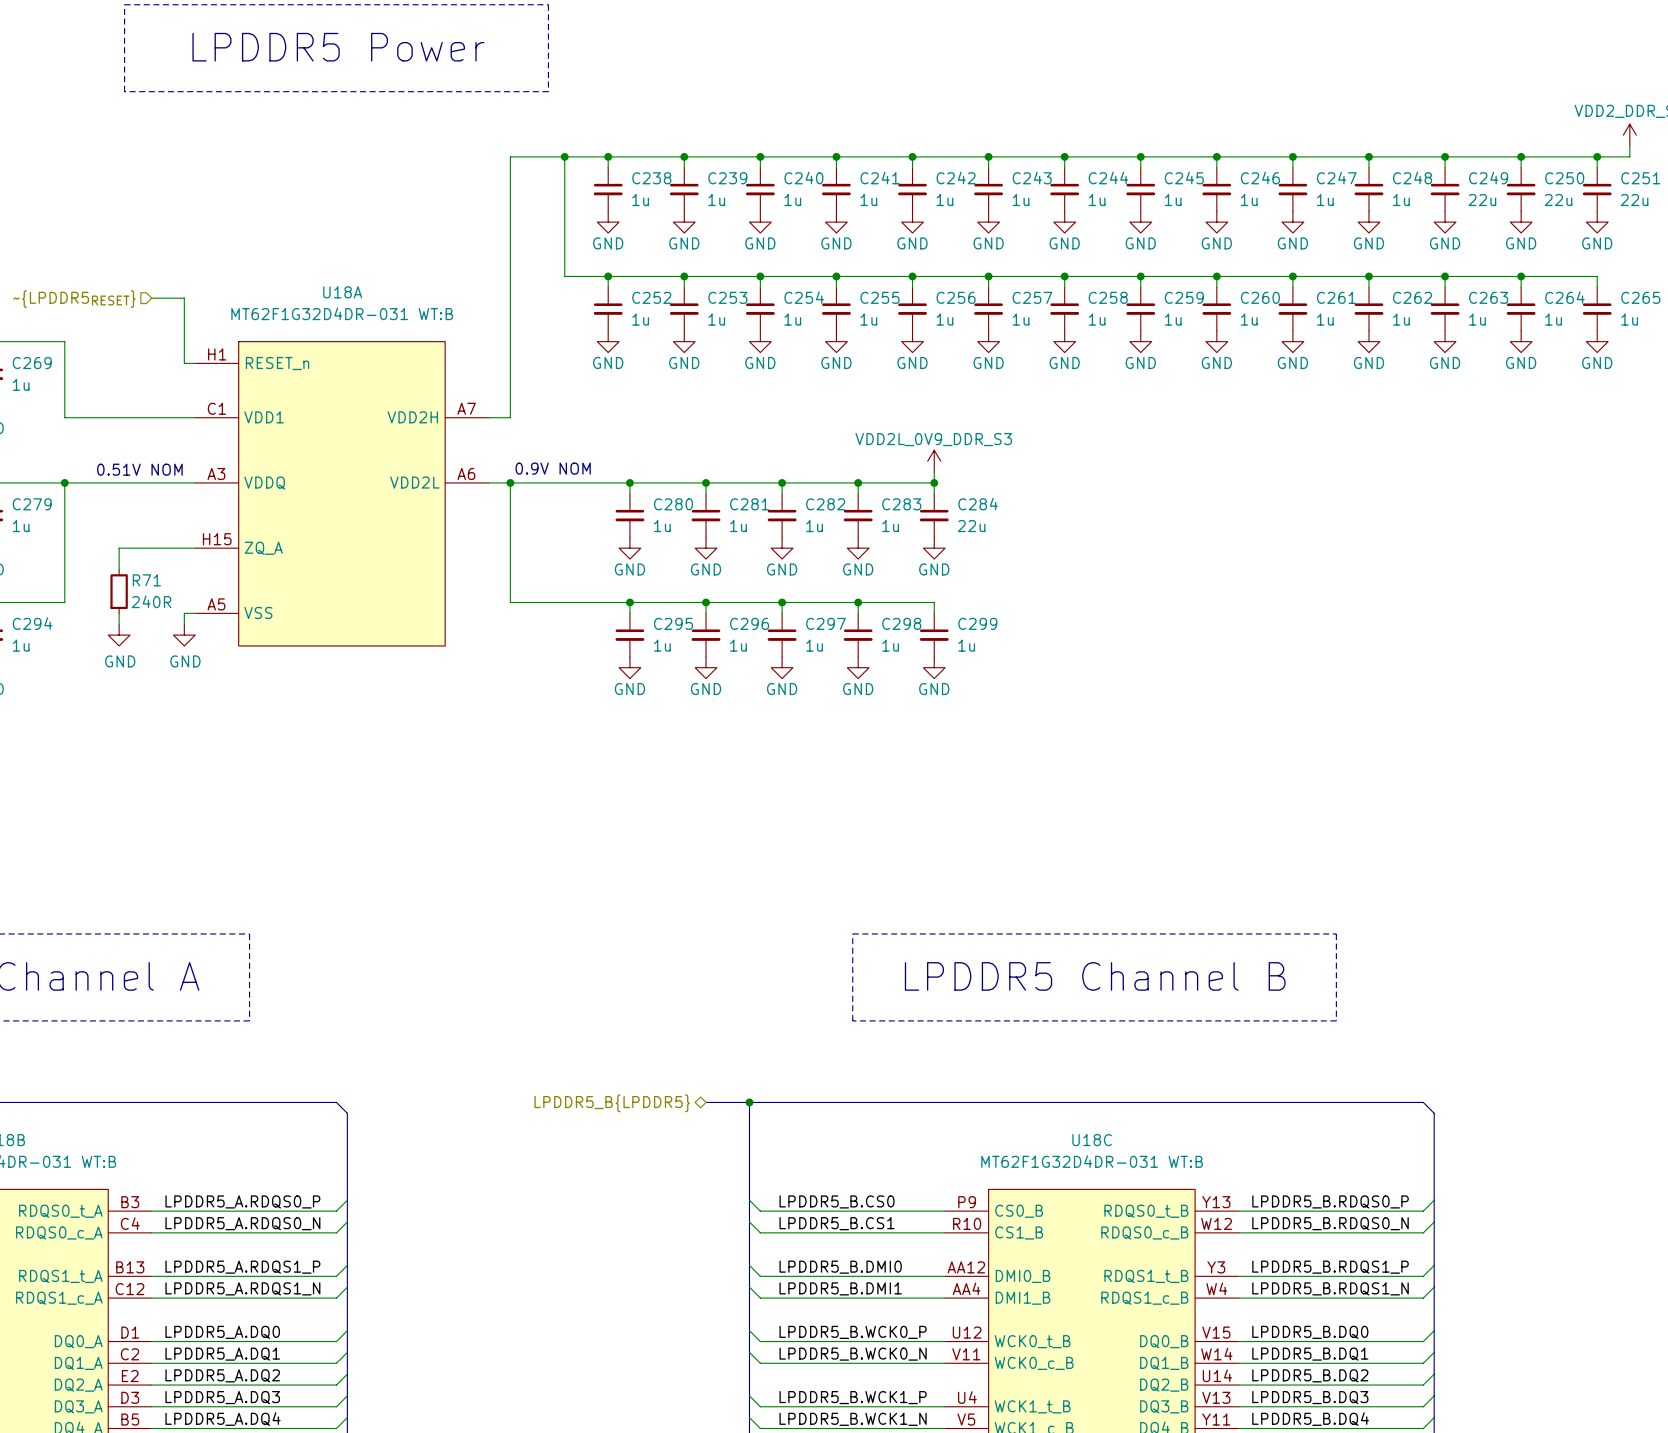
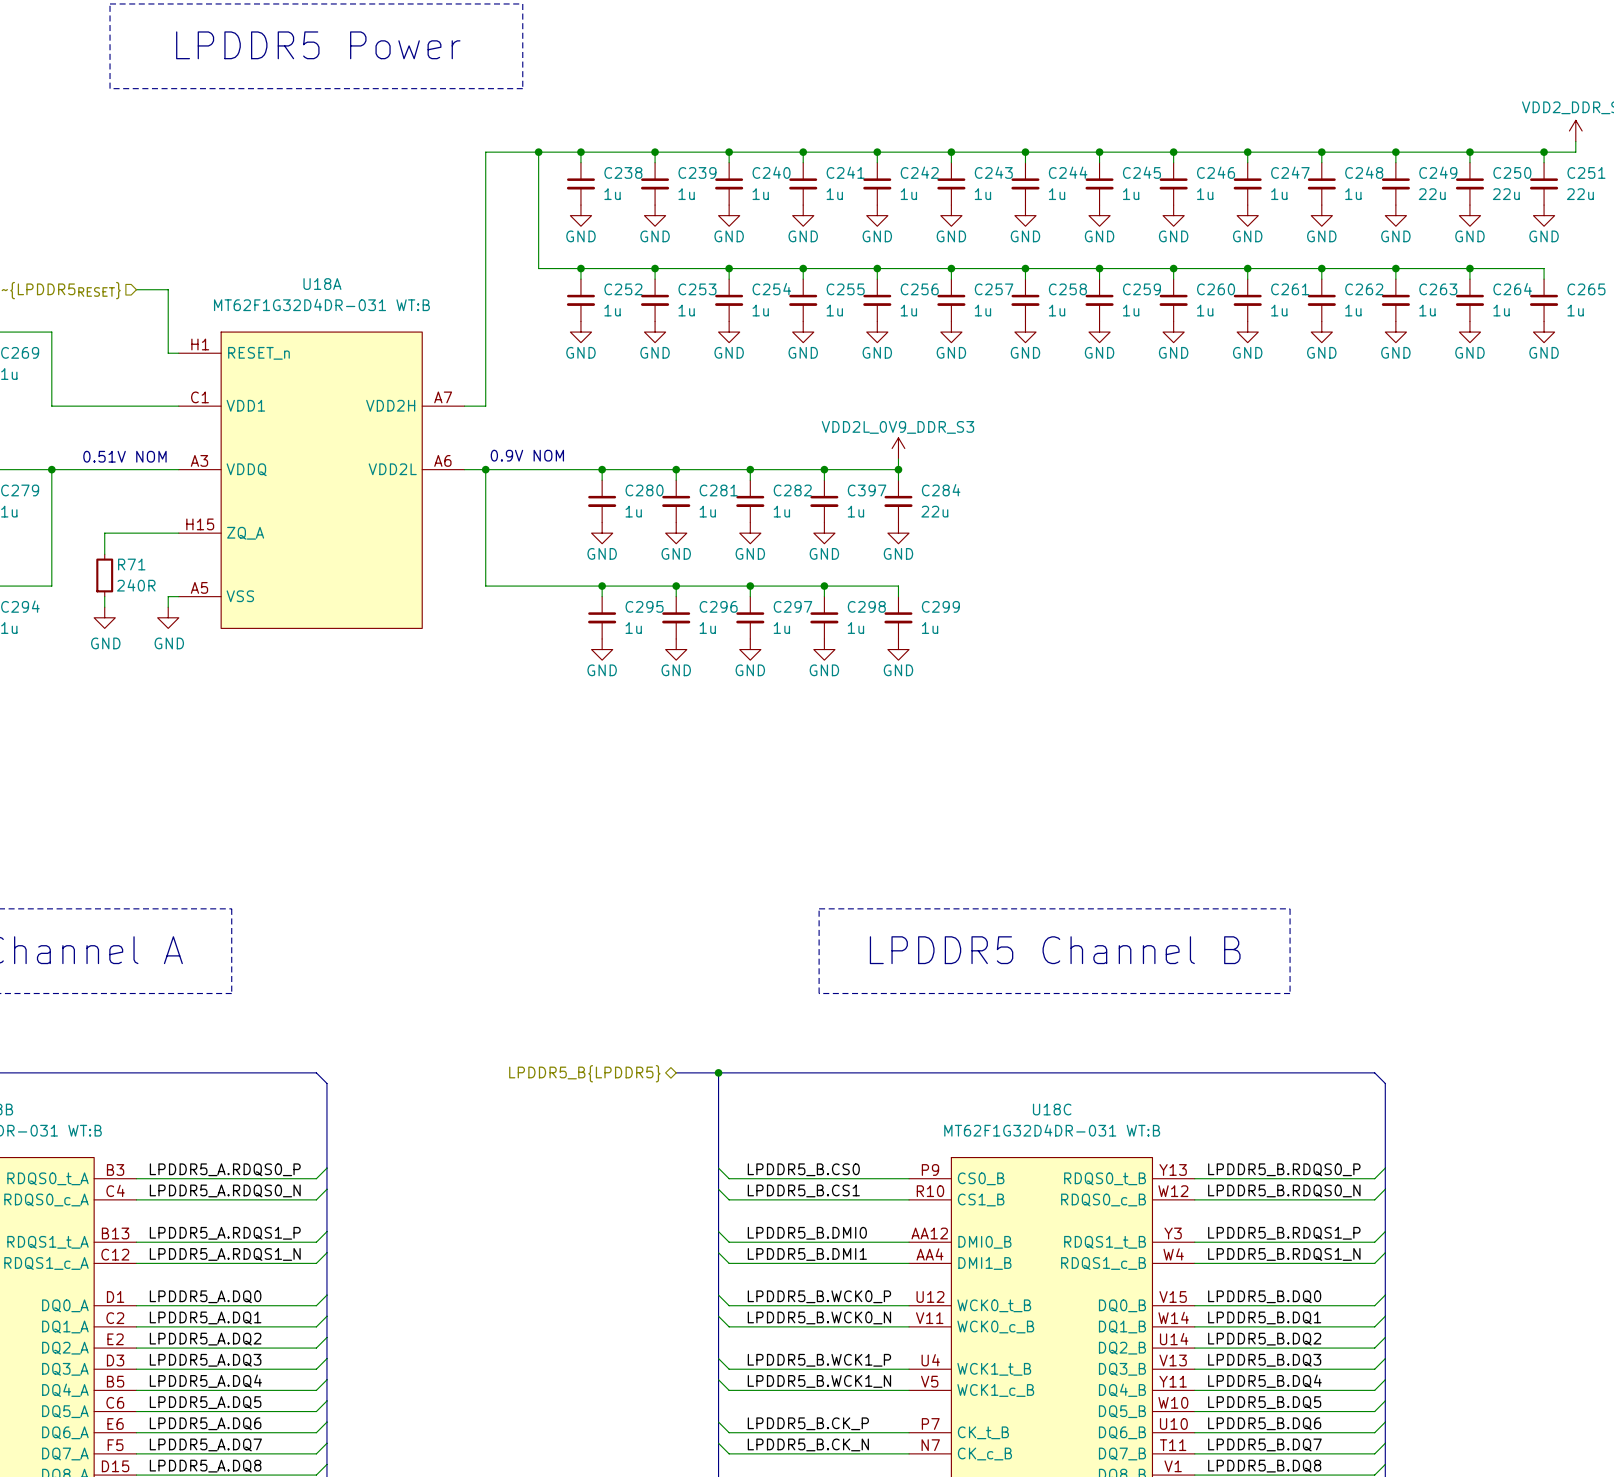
C283 name: C283 (901, 504) -> C397 (867, 490)

